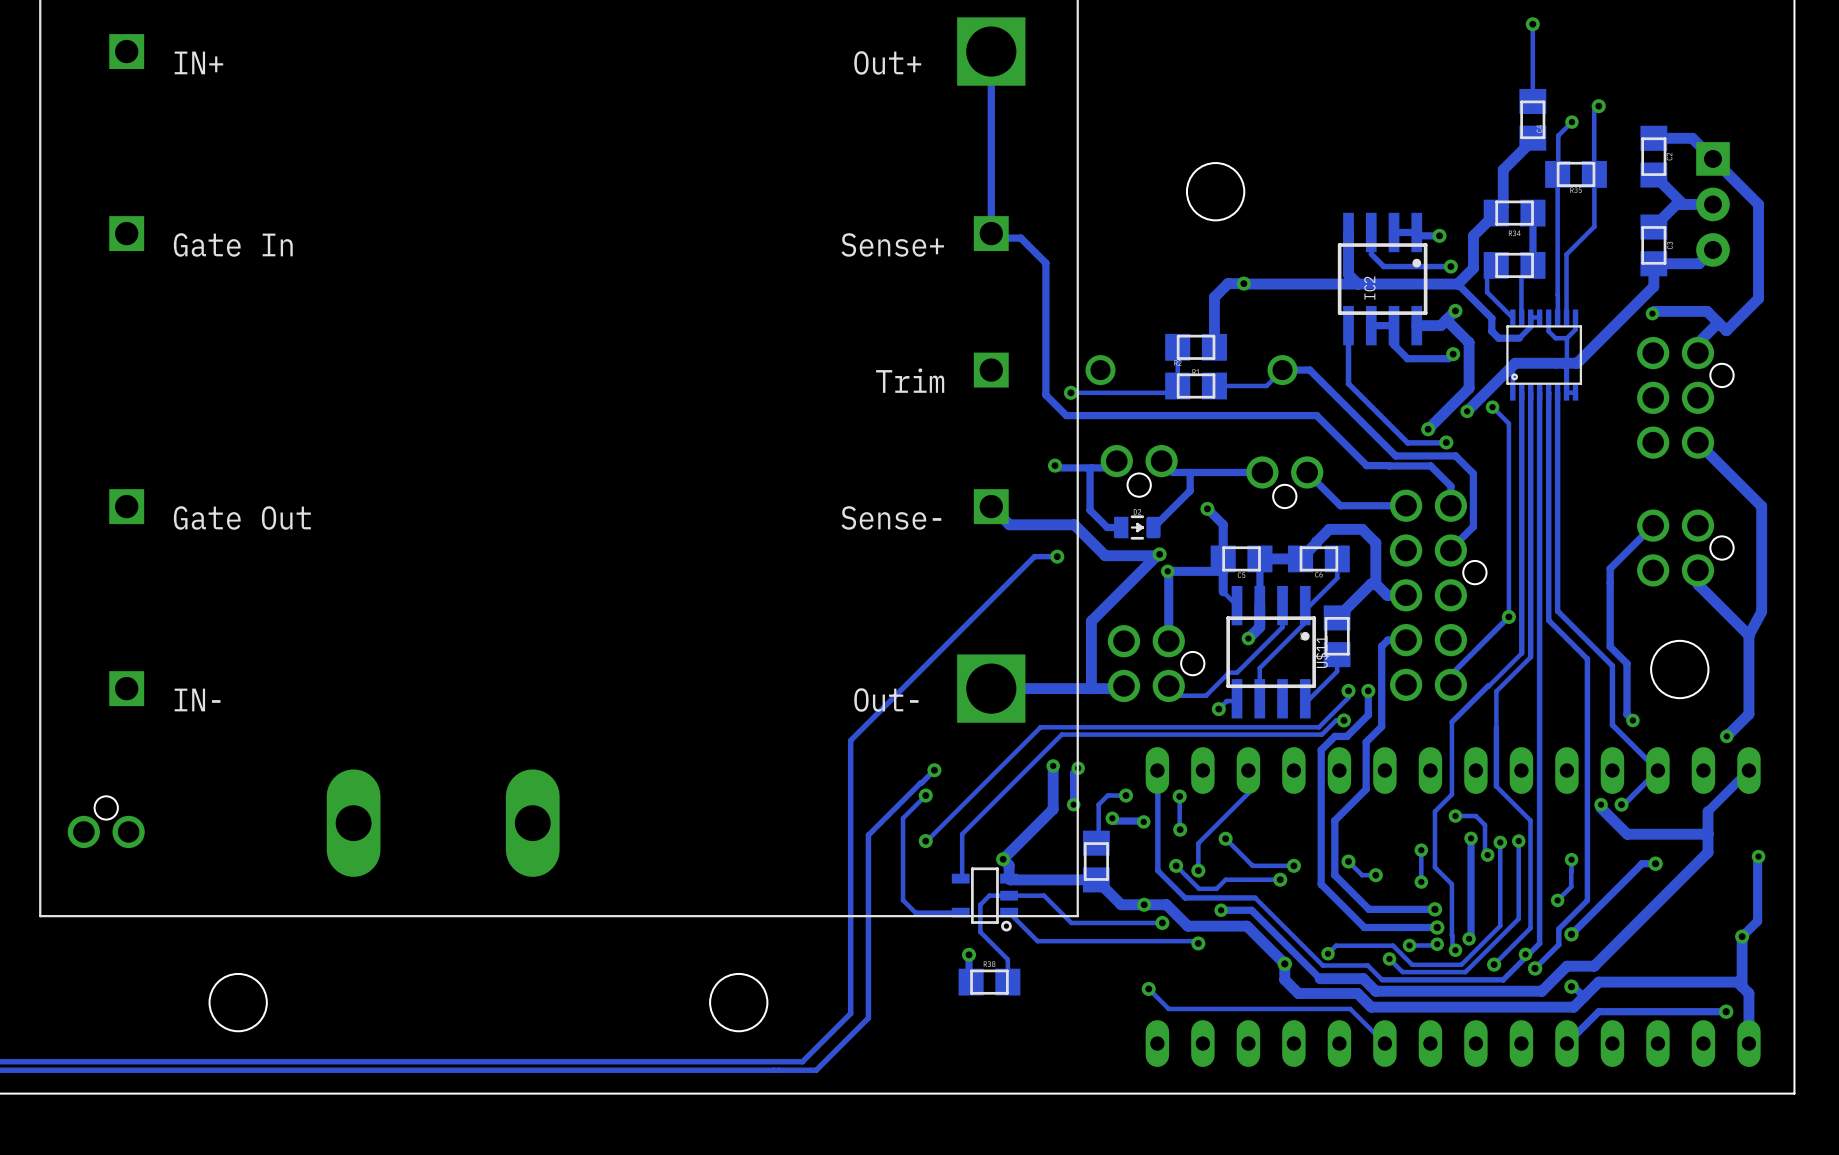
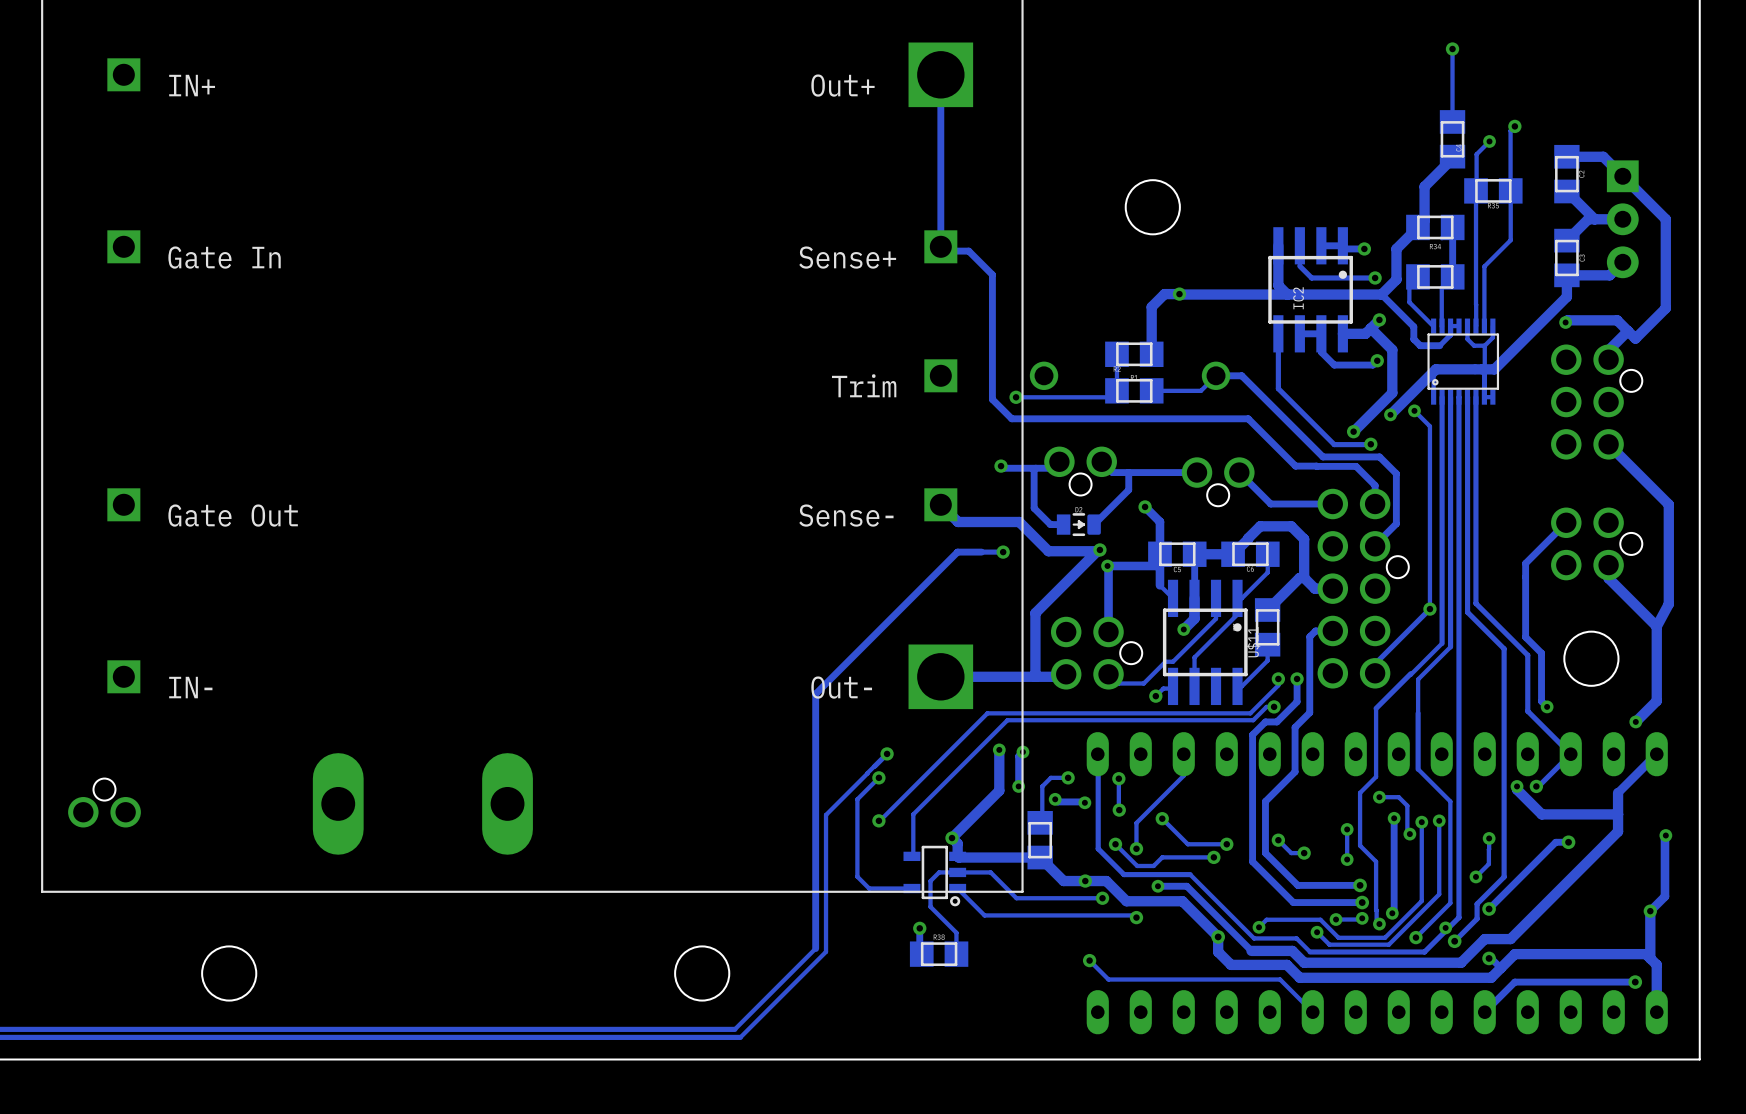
track: (1034, 556) (850, 740) (850, 1013) (802, 1061) (773, 1061) -> (981, 552) (957, 552) (815, 694) (815, 948) (734, 1029)
track: (921, 783) (868, 835) (868, 1018) (816, 1070) (779, 1070) -> (874, 766) (826, 814) (826, 951) (740, 1037)

